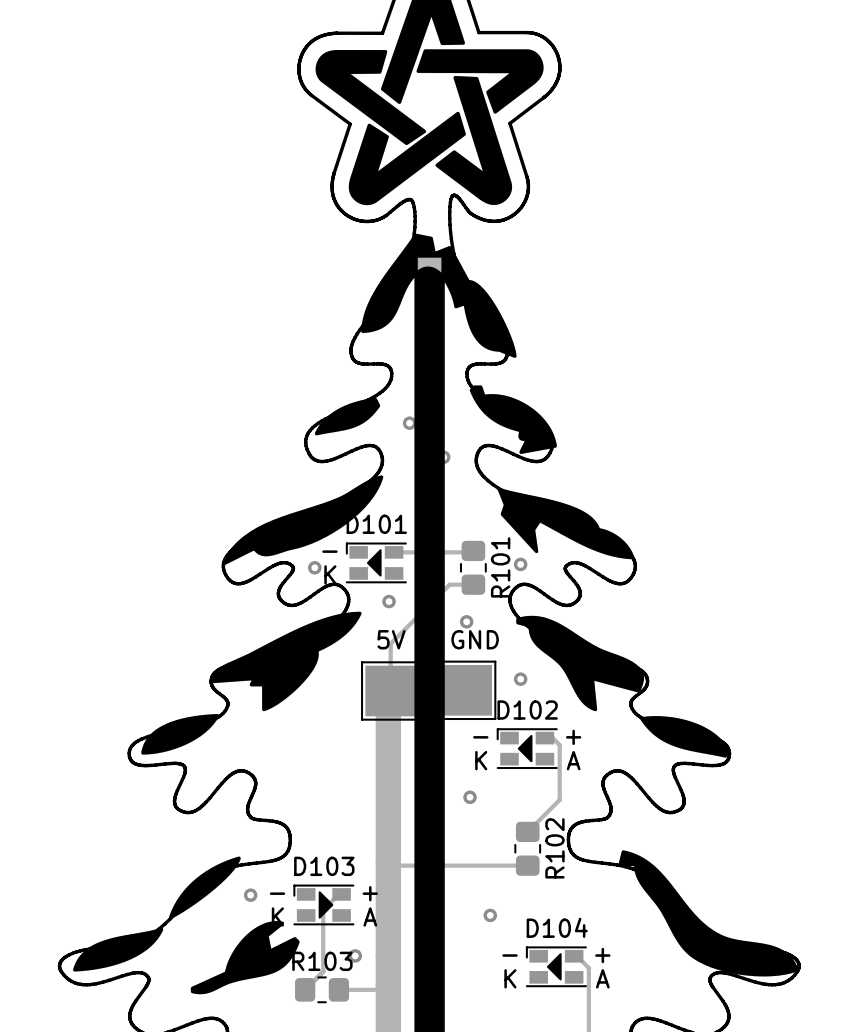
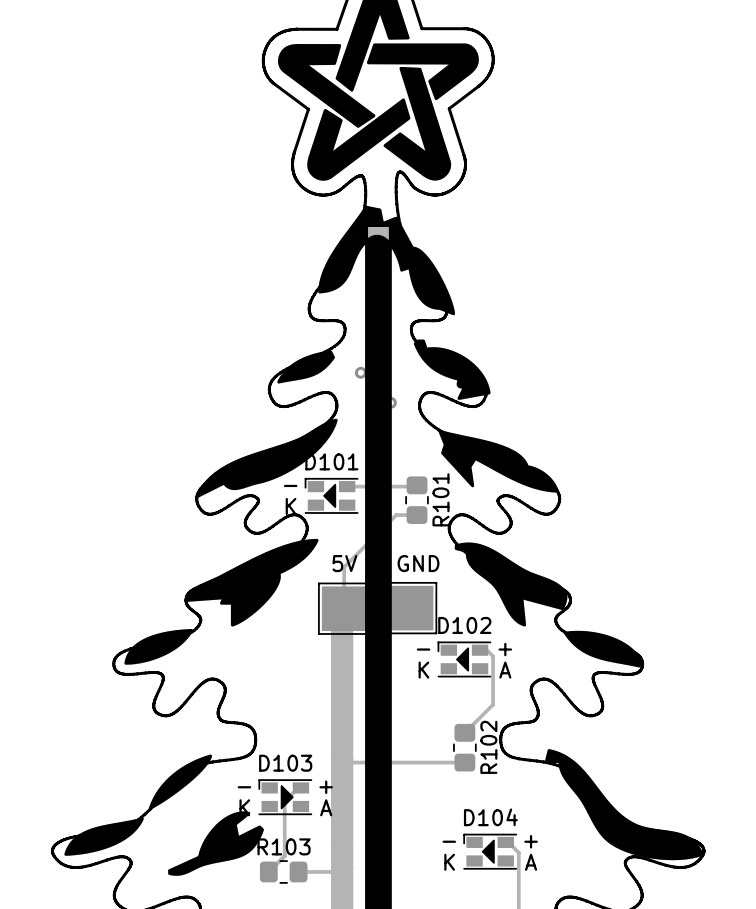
via: (520, 564) -> none
via: (314, 567) -> none
via: (389, 601) -> none
via: (466, 621) -> none
via: (520, 679) -> none
via: (470, 797) -> none
via: (250, 895) -> none
via: (490, 915) -> none
via: (355, 955) -> none

